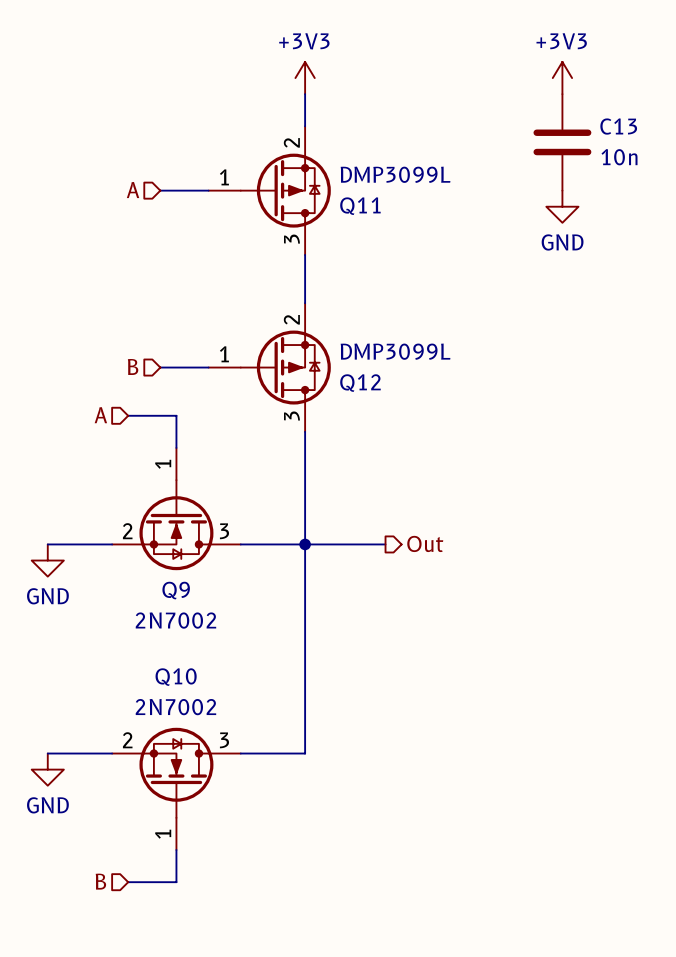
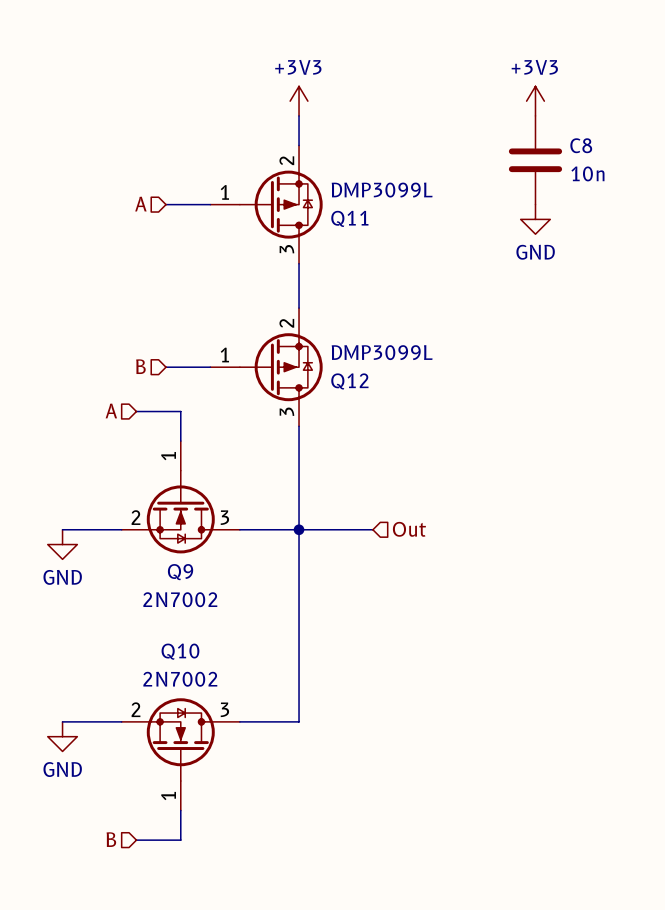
C13 name: C13 (618, 126) -> C8 (581, 145)
hierarchical label shape: output (425, 543) -> input (409, 529)

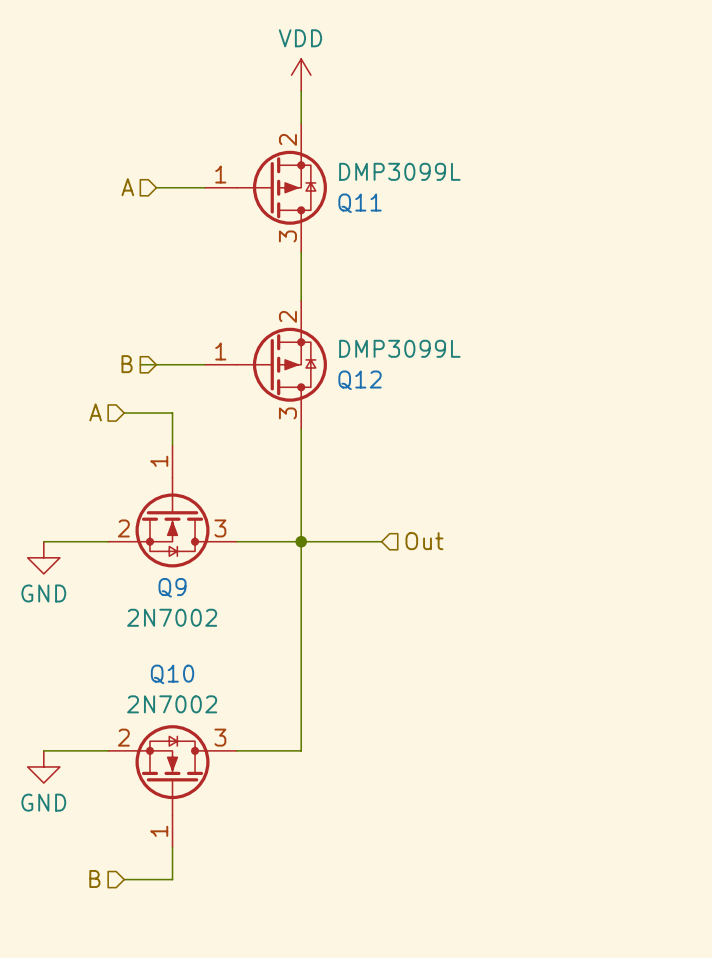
power symbol: +3V3 (299, 101) -> VDD (301, 75)
power symbol: +3V3 (535, 101) -> none
C8: 10n (535, 160) -> none
power symbol: GND (535, 219) -> none
wire: none -> (140, 364) (156, 364)

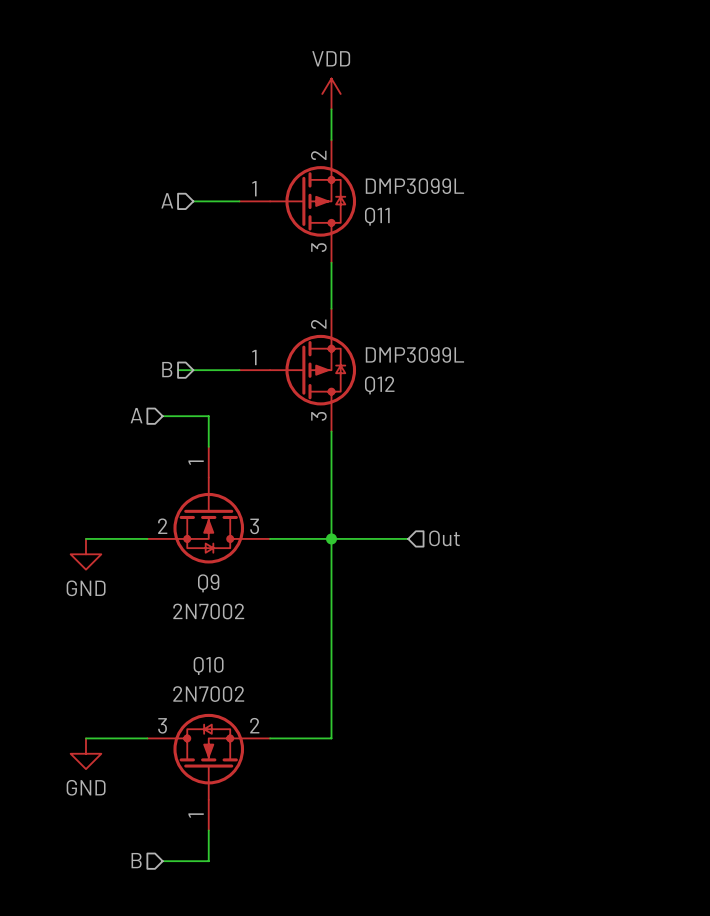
Q10 flip: as is (172, 770) -> left-right (208, 756)

